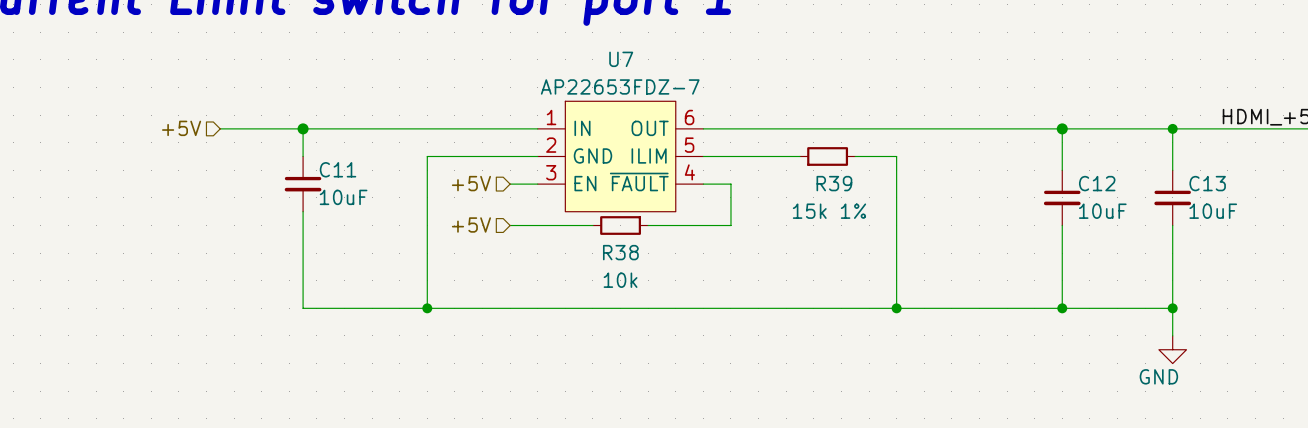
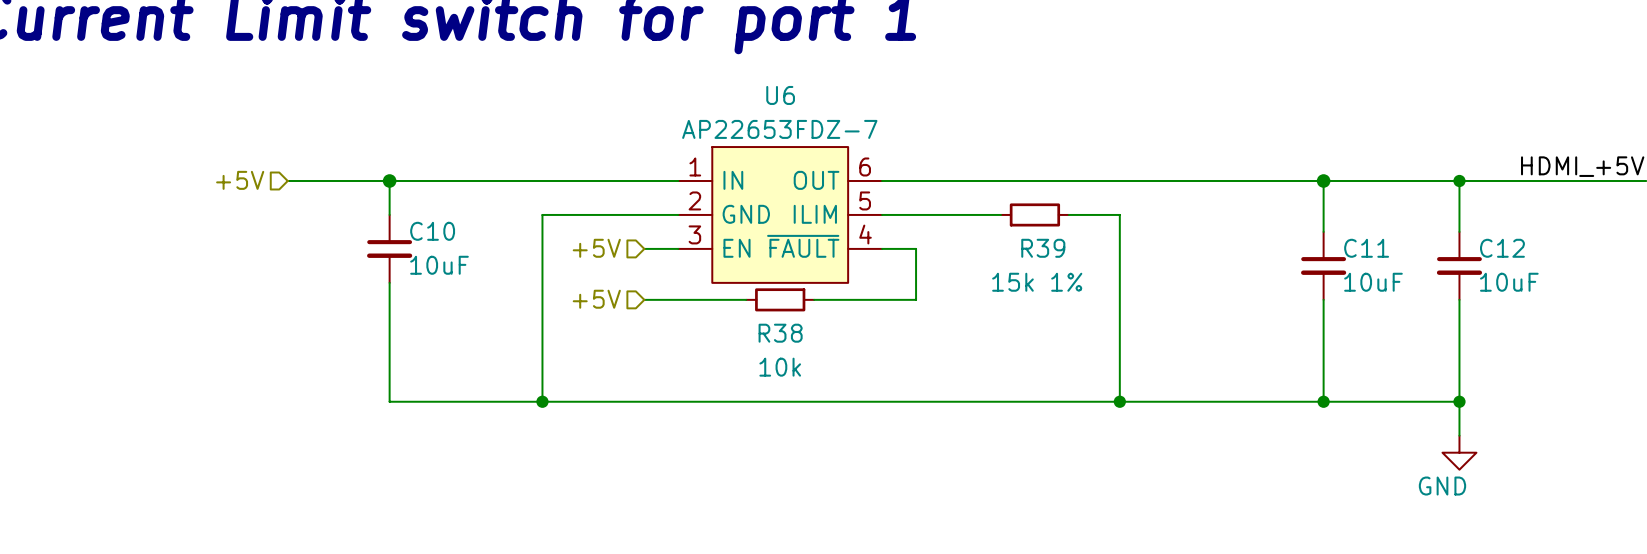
U7 name: U7 (621, 59) -> U6 (780, 95)
C11 name: C11 (338, 169) -> C10 (432, 231)
C12 name: C12 (1097, 183) -> C11 (1366, 248)
C13 name: C13 (1207, 183) -> C12 (1502, 248)

